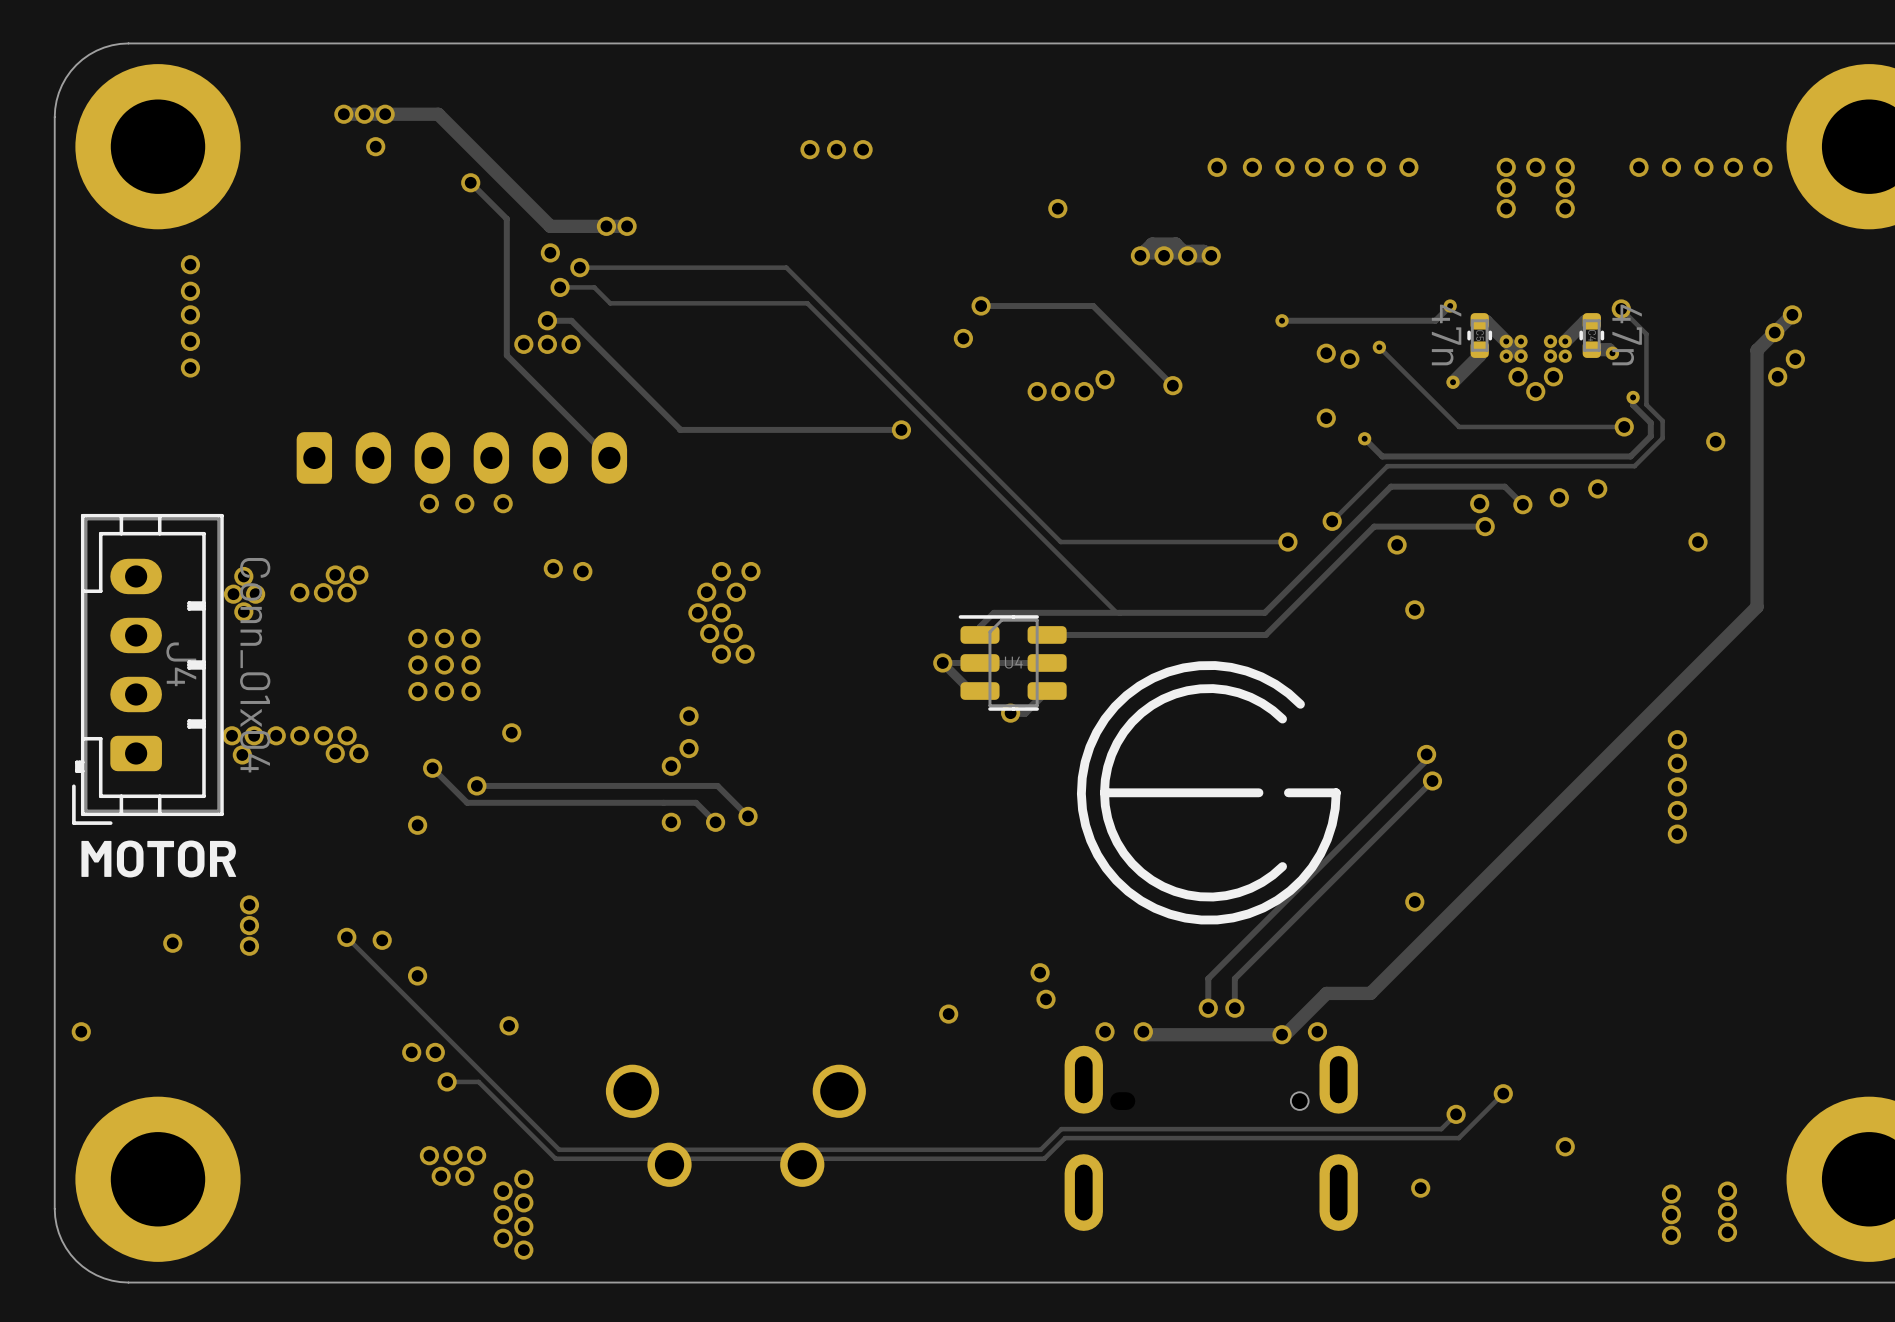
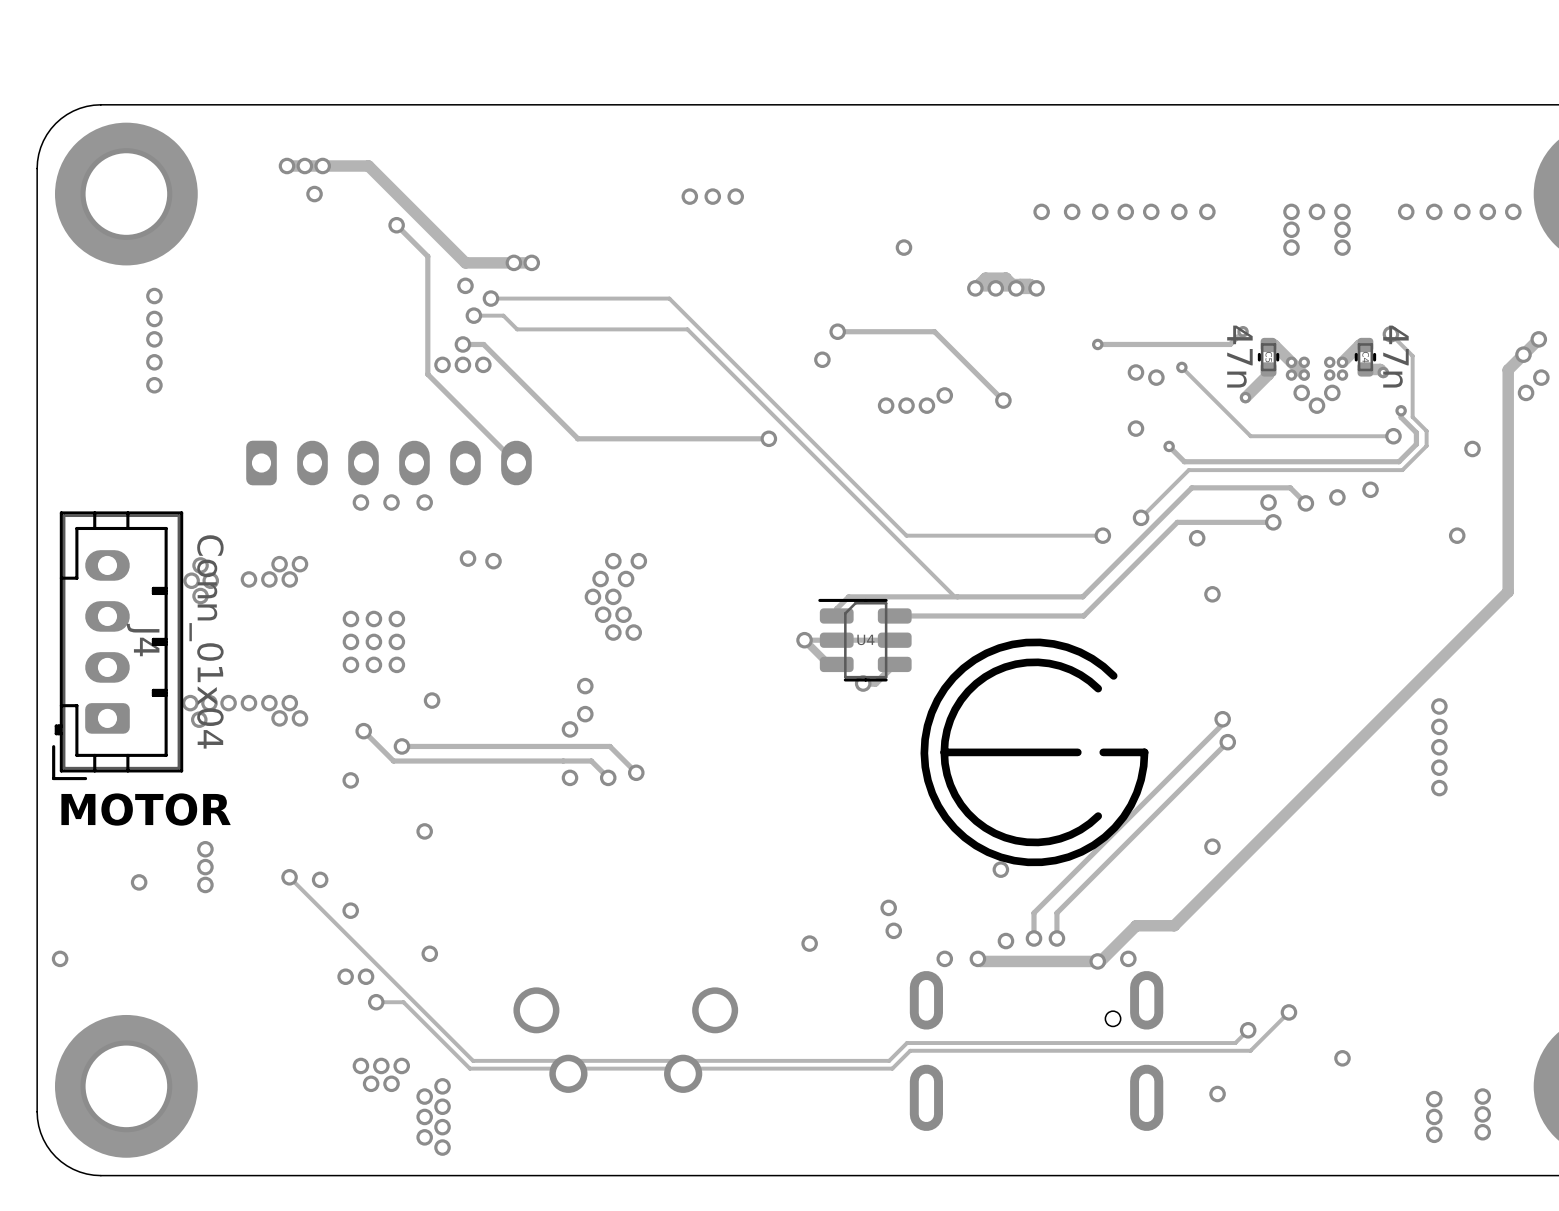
via: none -> (424, 831)
via: none -> (1000, 869)
via: none -> (1005, 941)

